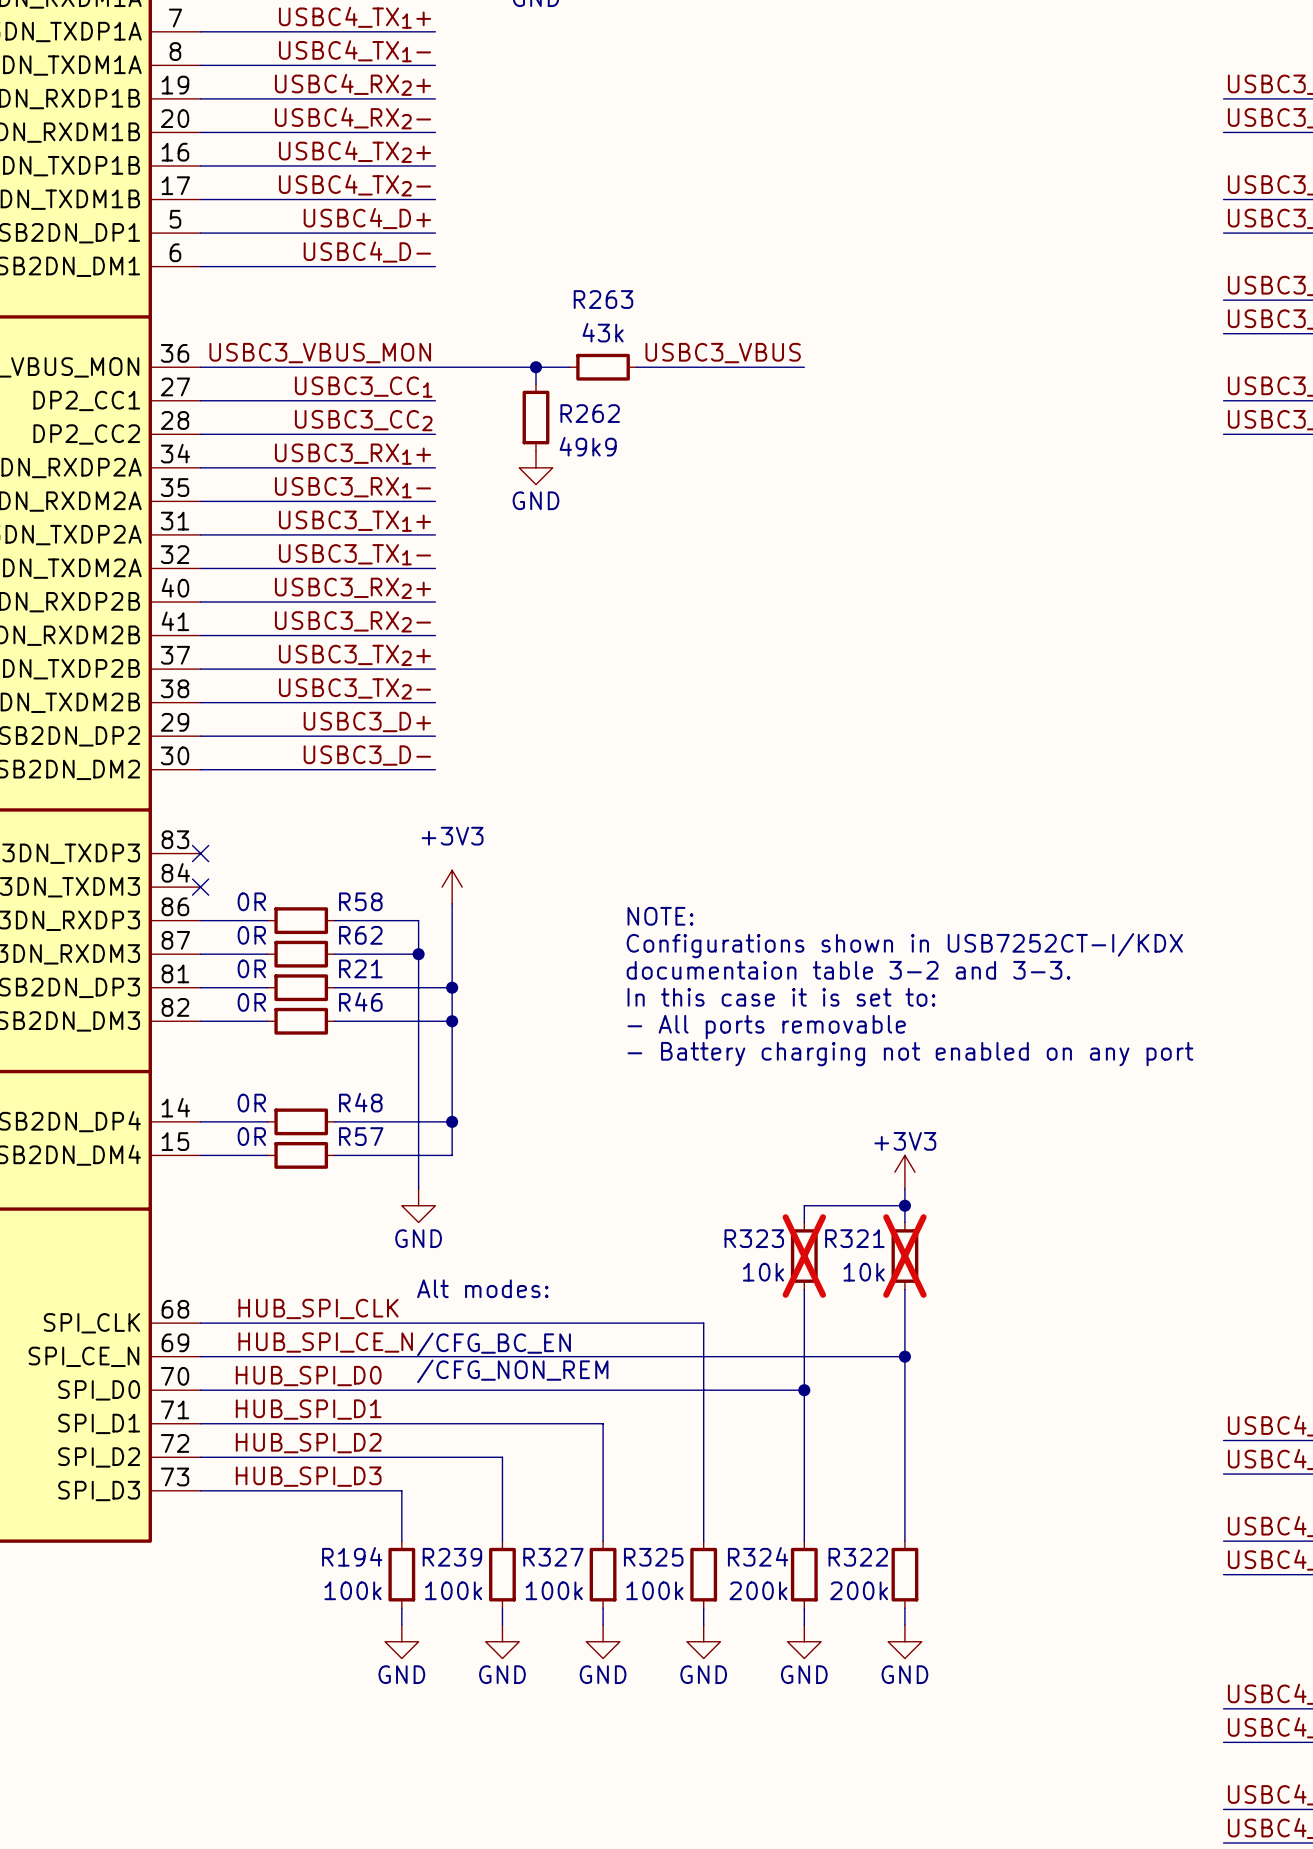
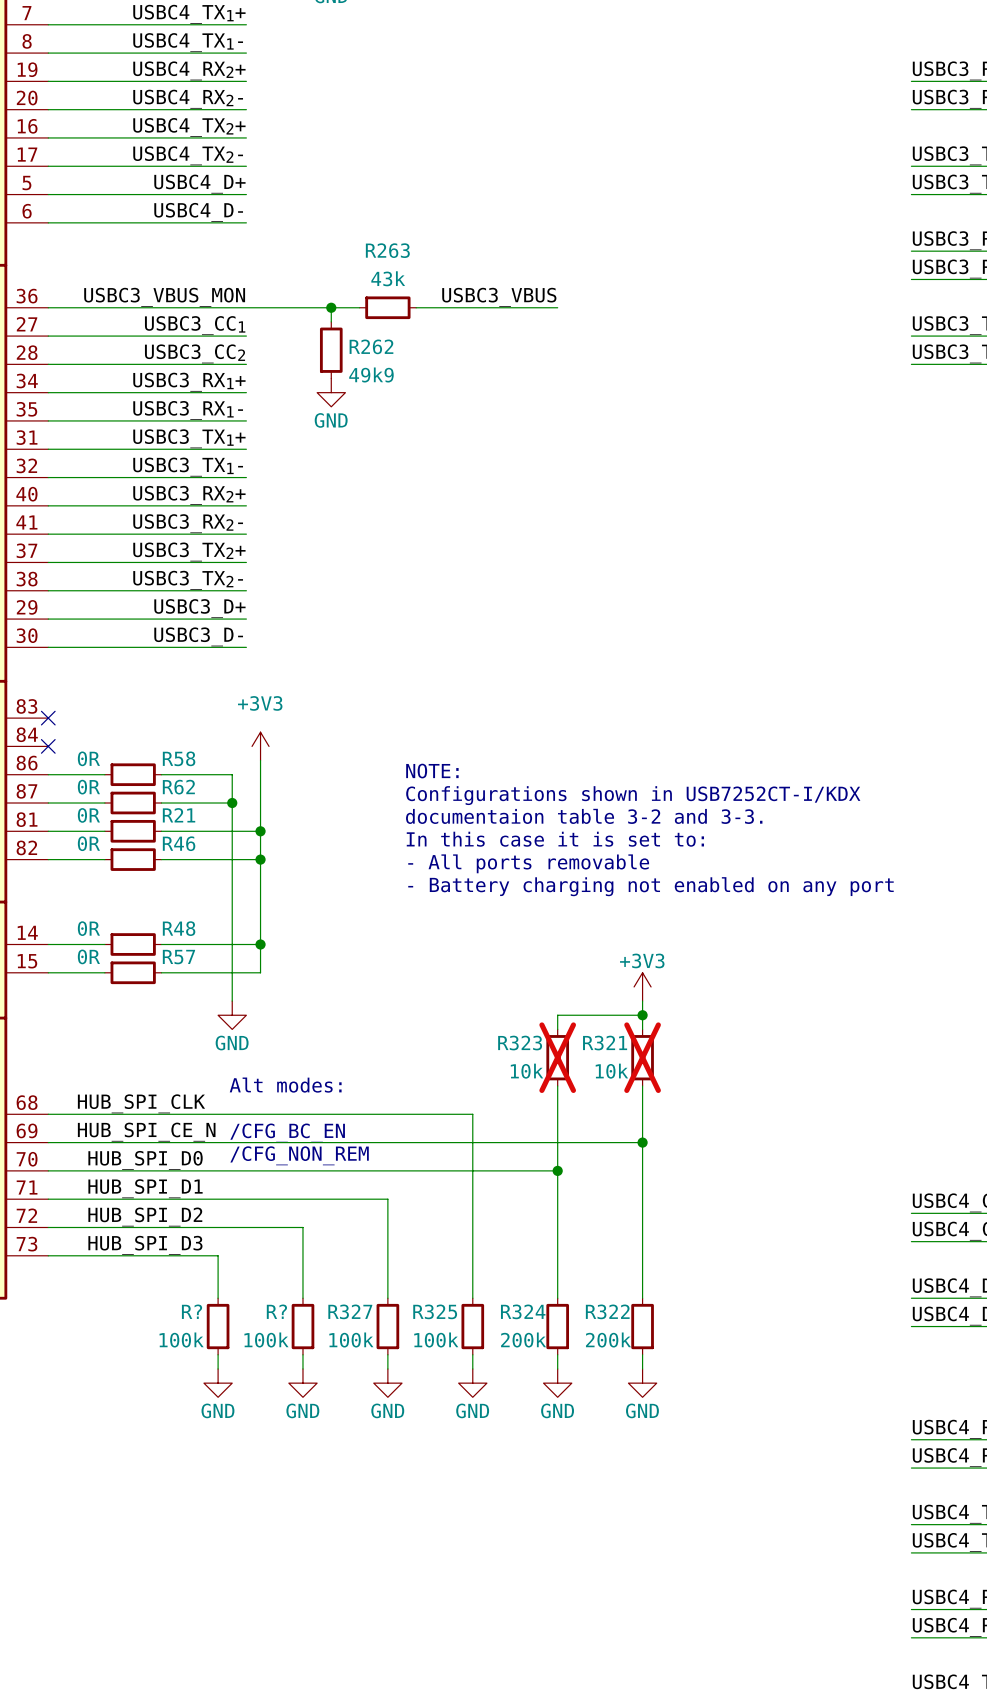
R194 name: R194 (352, 1556) -> R? (192, 1311)
R239 name: R239 (452, 1557) -> R? (276, 1311)

